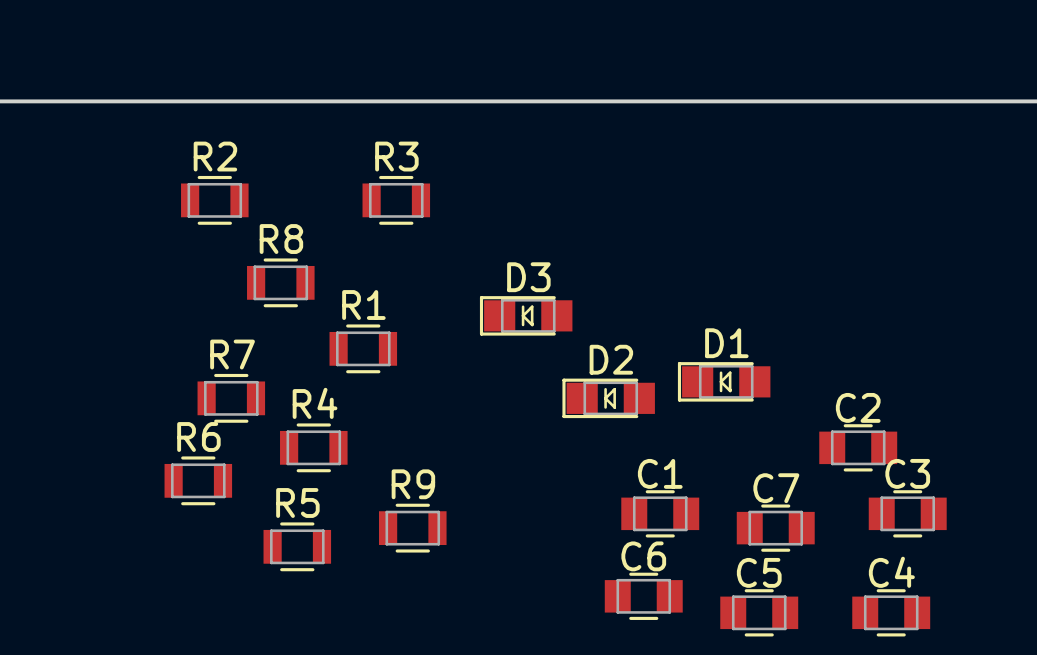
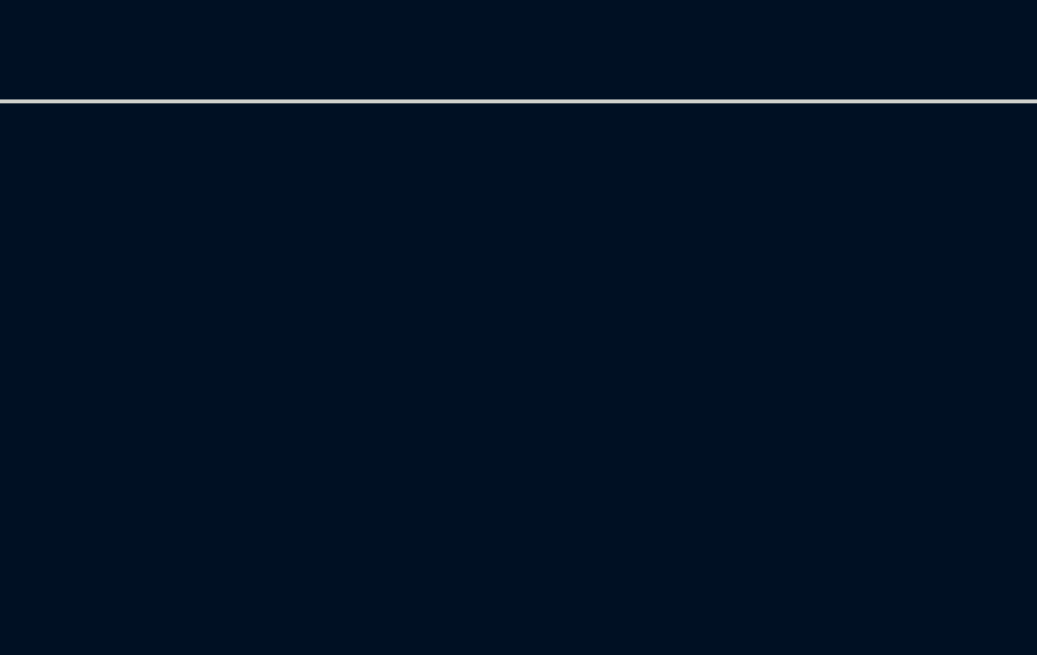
R2: (214, 200) -> none
R3: (396, 200) -> none
R8: (280, 282) -> none
D3: (526, 315) -> none
R1: (363, 348) -> none
D1: (724, 381) -> none
R7: (231, 398) -> none
D2: (608, 398) -> none
R4: (313, 447) -> none
C2: (858, 447) -> none
R6: (198, 480) -> none
C1: (660, 513) -> none
C3: (907, 513) -> none
R9: (412, 528) -> none
C7: (775, 528) -> none
R5: (297, 546) -> none
C6: (643, 596) -> none
C5: (759, 612) -> none
C4: (891, 612) -> none

